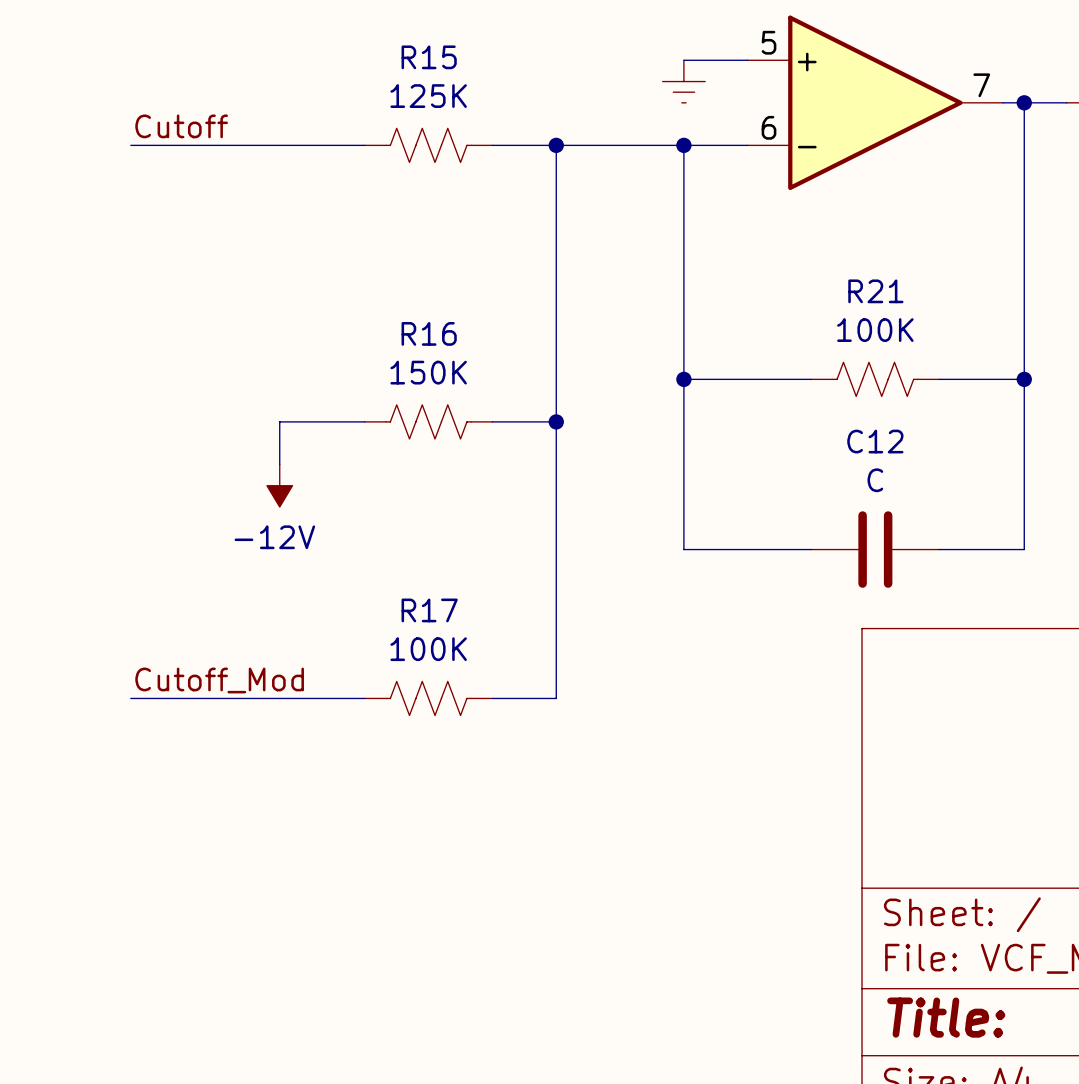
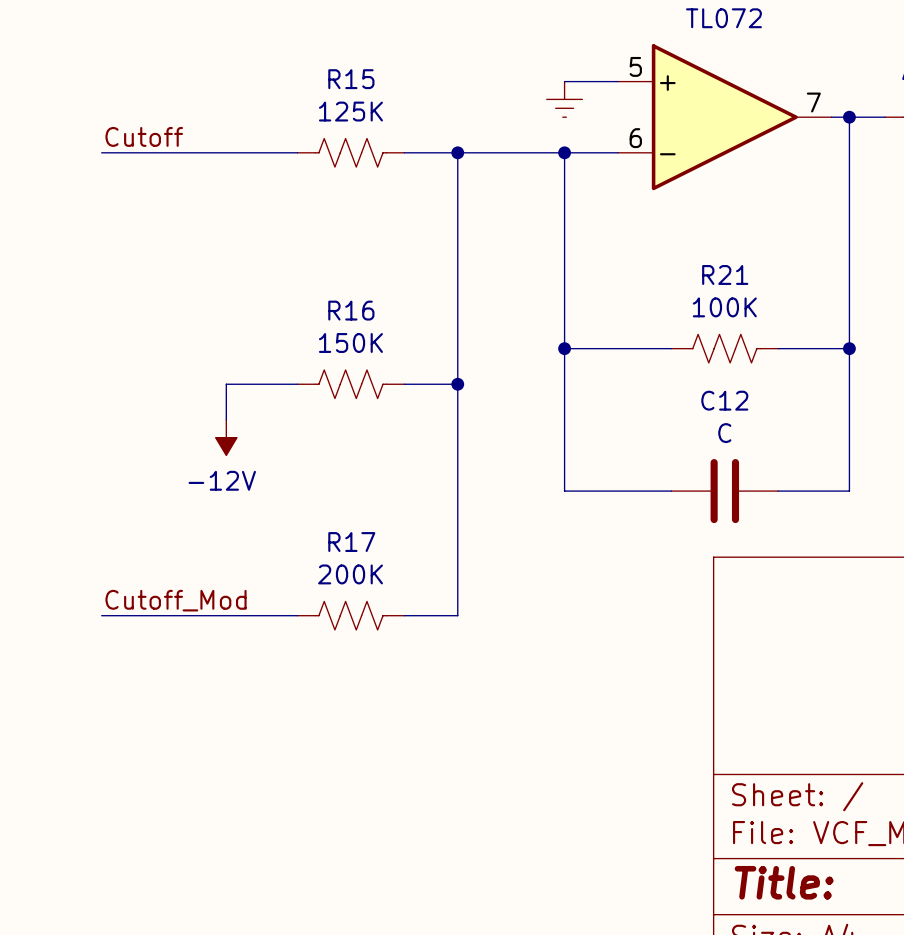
R17 value: 100K (428, 649) -> 200K (350, 574)

